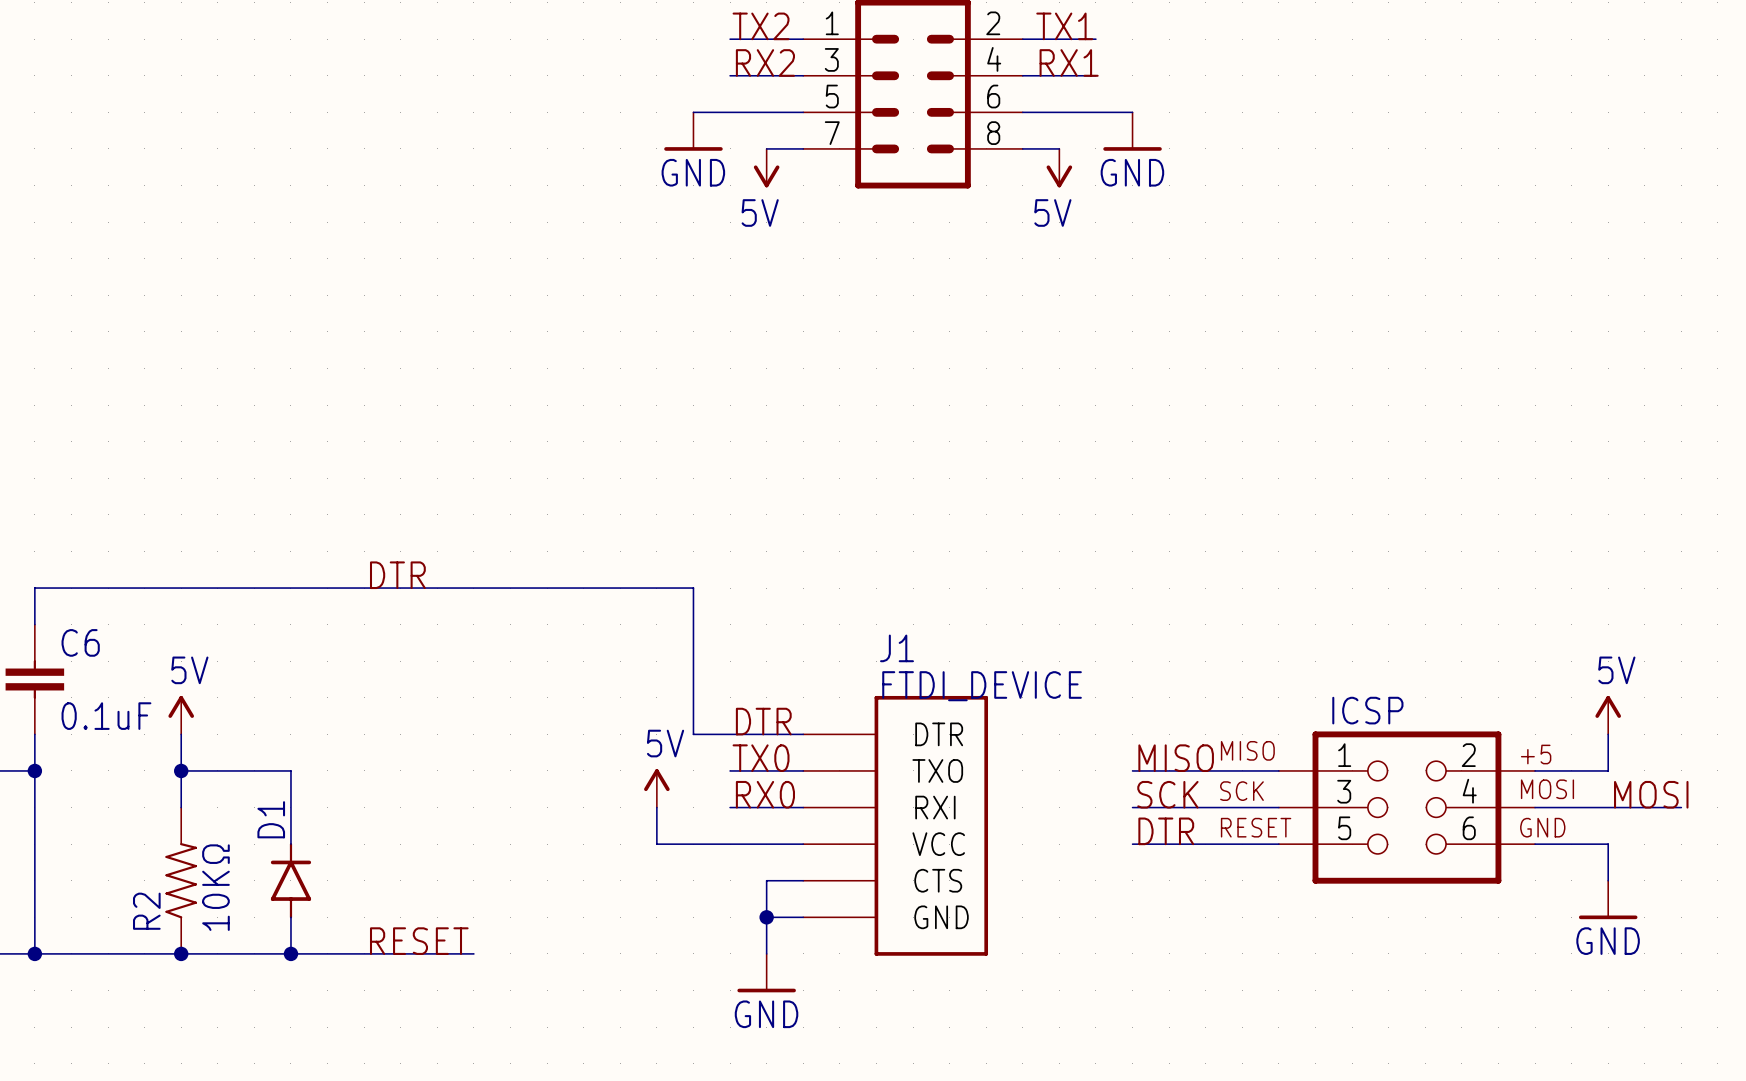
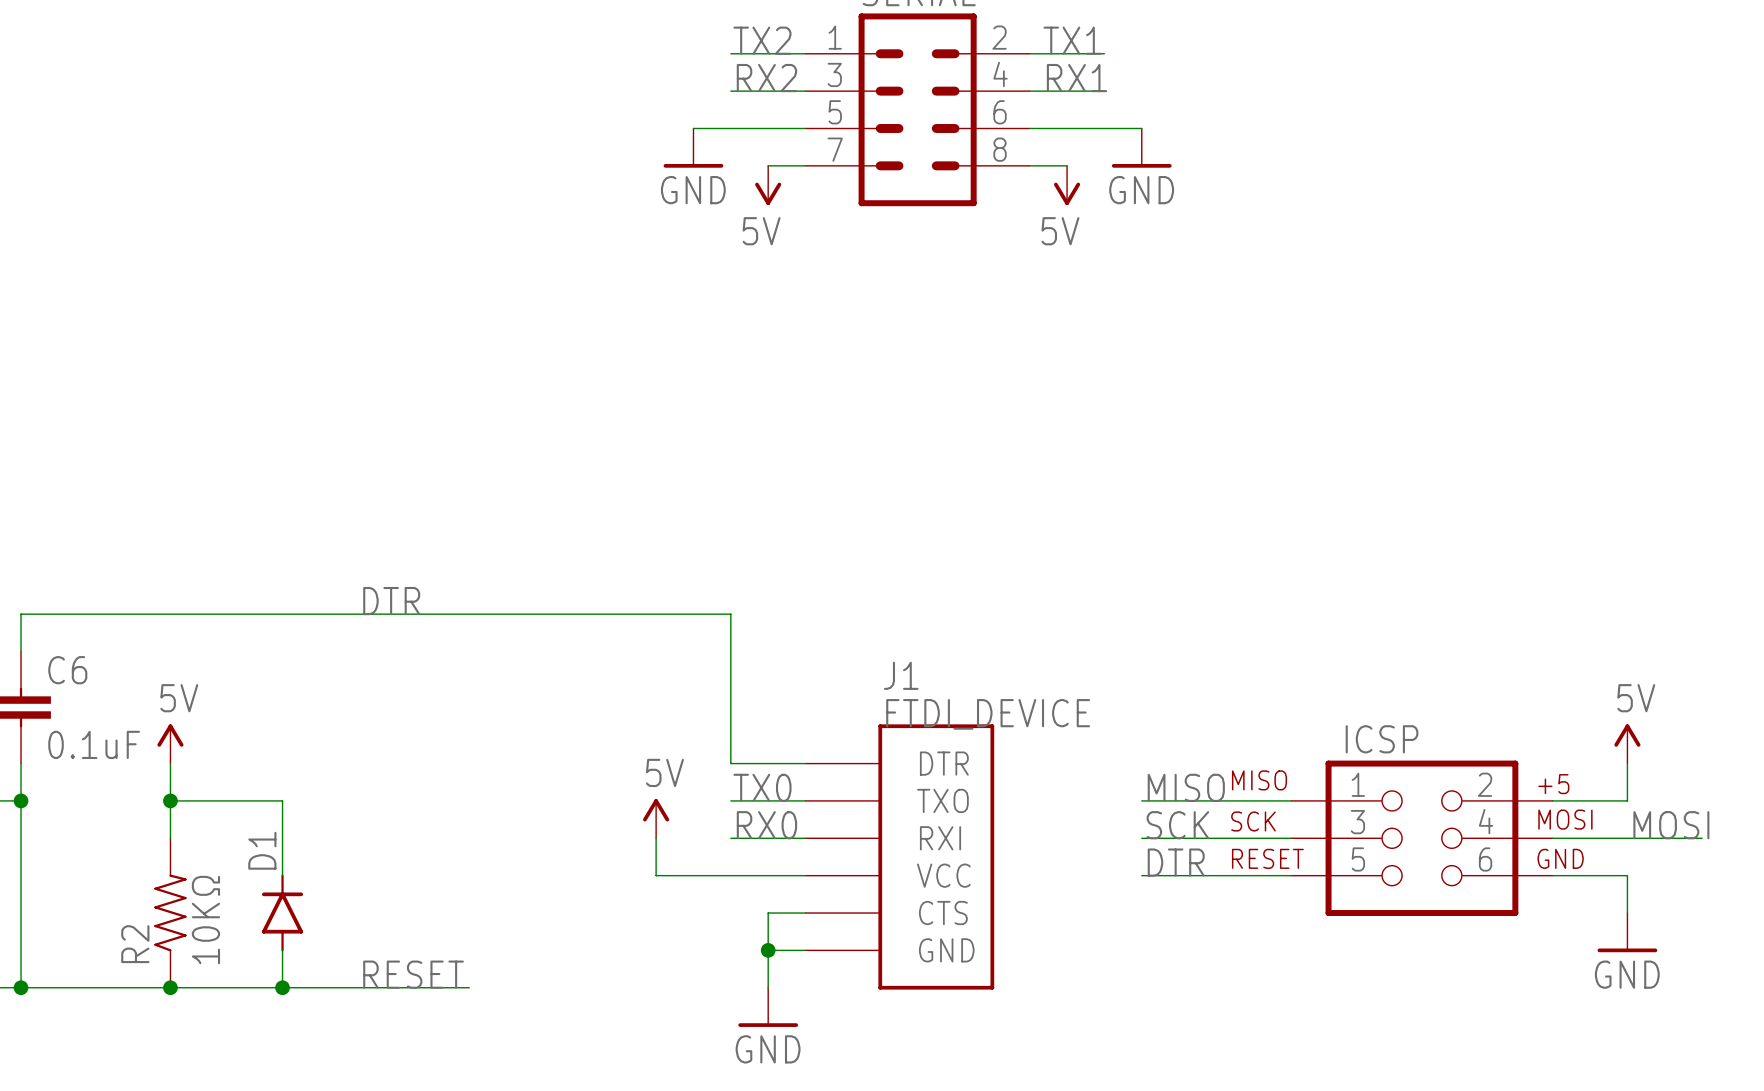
wire: (693, 588) (693, 734) (730, 734) -> (693, 614) (730, 614) (730, 763)
label: DTR (763, 721) -> none

